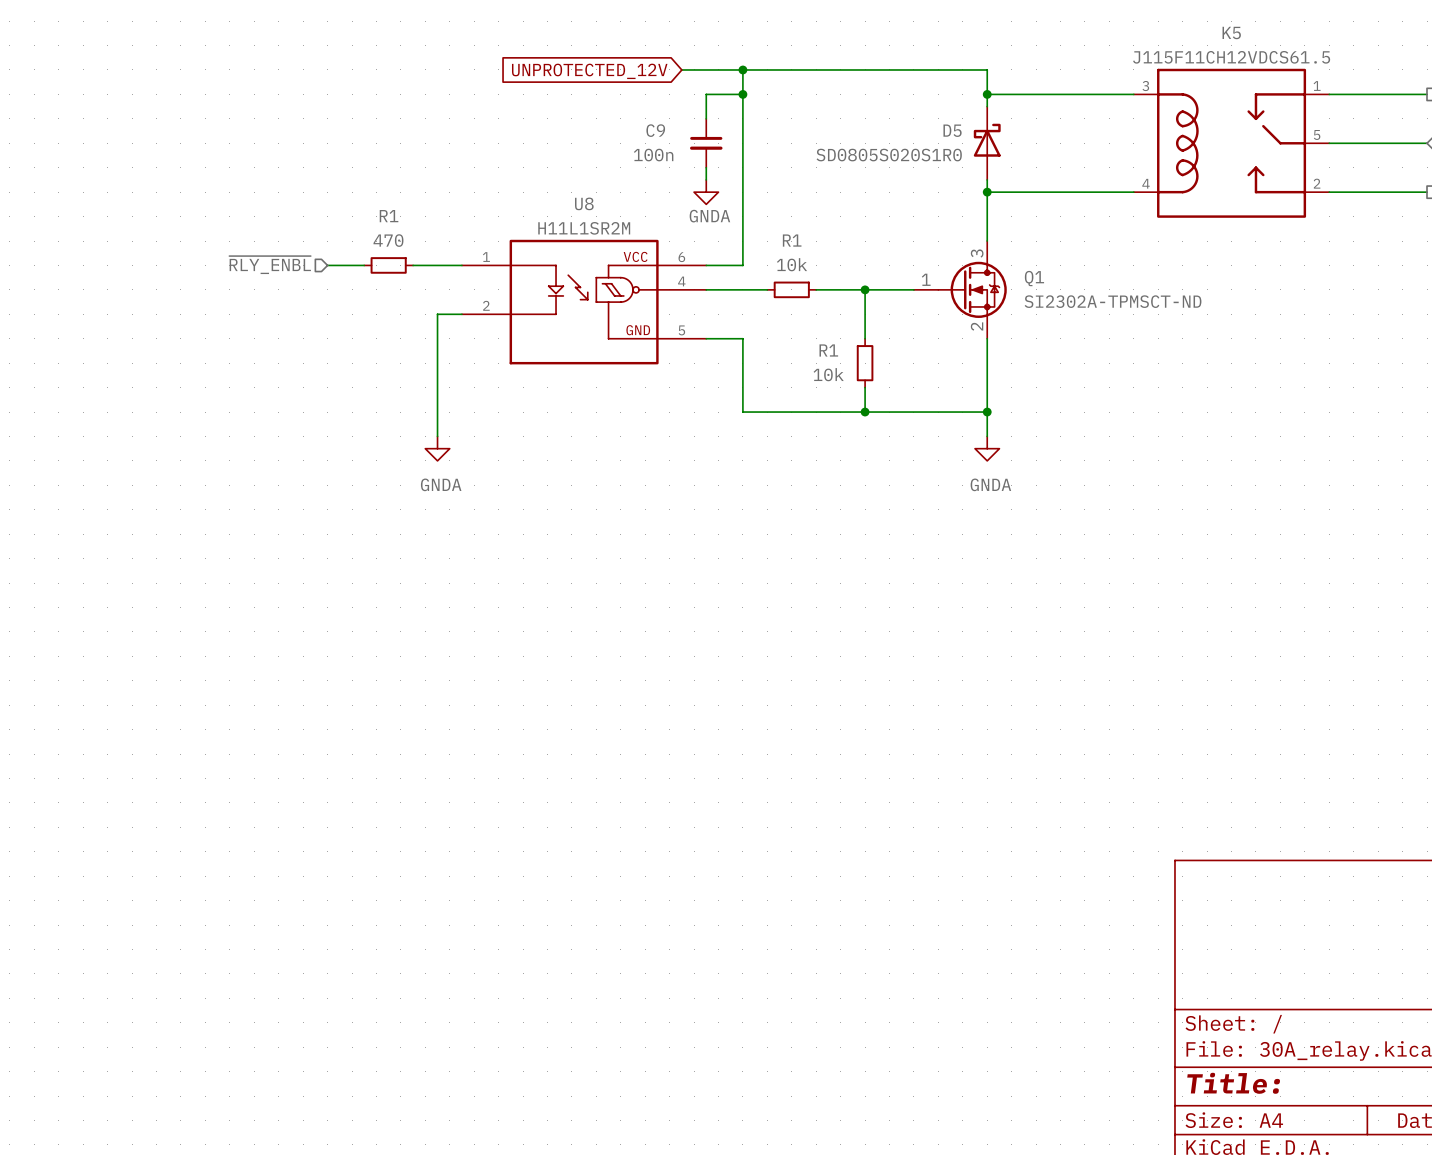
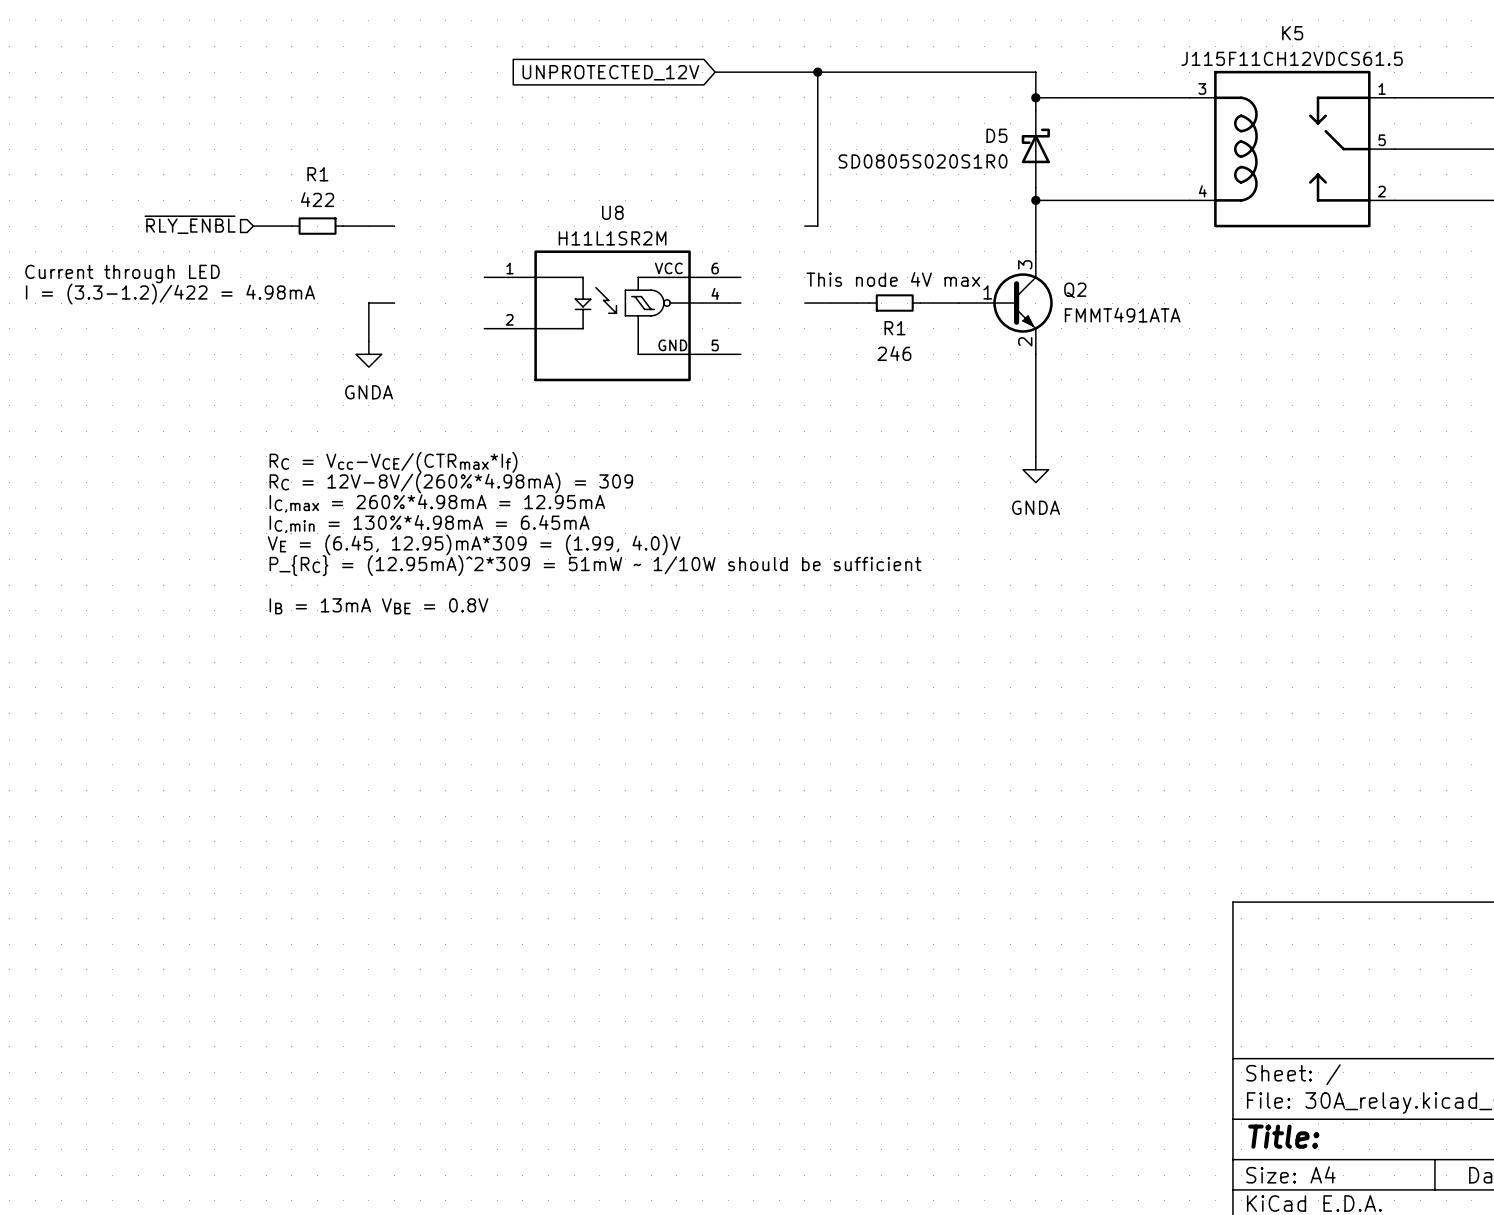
wire: (742, 69) (742, 265) (706, 265) -> none
junction: (742, 69) -> none
wire: none -> (817, 72) (817, 226) (804, 226)
junction: none -> (817, 72)
wire: (742, 94) (706, 94) (706, 118) -> none
junction: (742, 94) -> none
C9: 100n (706, 143) -> none
wire: (706, 167) (706, 179) -> none
power symbol: GNDA (706, 192) -> none
R1: none -> 422 (317, 226)
text: none -> Current through LED (122, 273)
hierarchical label position: ~{RLY_ENBL} (270, 265) -> ~{RLY_ENBL} (190, 224)
wire: (327, 265) (364, 265) -> (253, 226) (291, 226)
R1: 470 (388, 265) -> none
wire: (413, 265) (461, 265) -> (343, 226) (394, 226)
text: none -> This node 4V max (893, 279)
text: none -> I = (3.3-1.2)/422 = 4.98mA (170, 294)
wire: none -> (394, 303) (368, 303) (368, 341)
wire: (706, 289) (767, 289) -> (856, 303) (804, 303)
R1: 10k (791, 289) -> none
wire: (828, 289) (877, 289) -> none
R1: none -> 246 (894, 303)
wire: (865, 289) (865, 338) -> none
junction: (865, 289) -> none
Q2: none -> FMMT491ATA (1005, 303)
Q1: SI2302A-TPMSCT-ND (960, 289) -> none
wire: (461, 314) (437, 314) (437, 436) -> none
wire: (706, 338) (742, 338) (742, 412) (987, 412) -> none
R1: 10k (865, 363) -> none
wire: (865, 387) (865, 412) -> none
junction: (865, 412) -> none
junction: (987, 412) -> none
text: none -> RC = Vcc-VCE/(CTRmax*If) (393, 462)
power symbol position: GNDA (437, 448) -> GNDA (368, 354)
text: none -> RC = 12V-8V/(260%*4.98mA) = 309 (451, 482)
text: none -> IC,max = 260%*4.98mA = 12.95mA (437, 503)
text: none -> IC,min = 130%*4.98mA = 6.45mA (429, 524)
text: none -> VE = (6.45, 12.95)mA*309 = (1.99, 4.0)V (474, 544)
text: none -> P_{RC} = (12.95mA)^2*309 = 51mW ~ 1/10W should be sufficient (595, 565)
text: none -> IB = 13mA VBE = 0.8V (378, 606)

